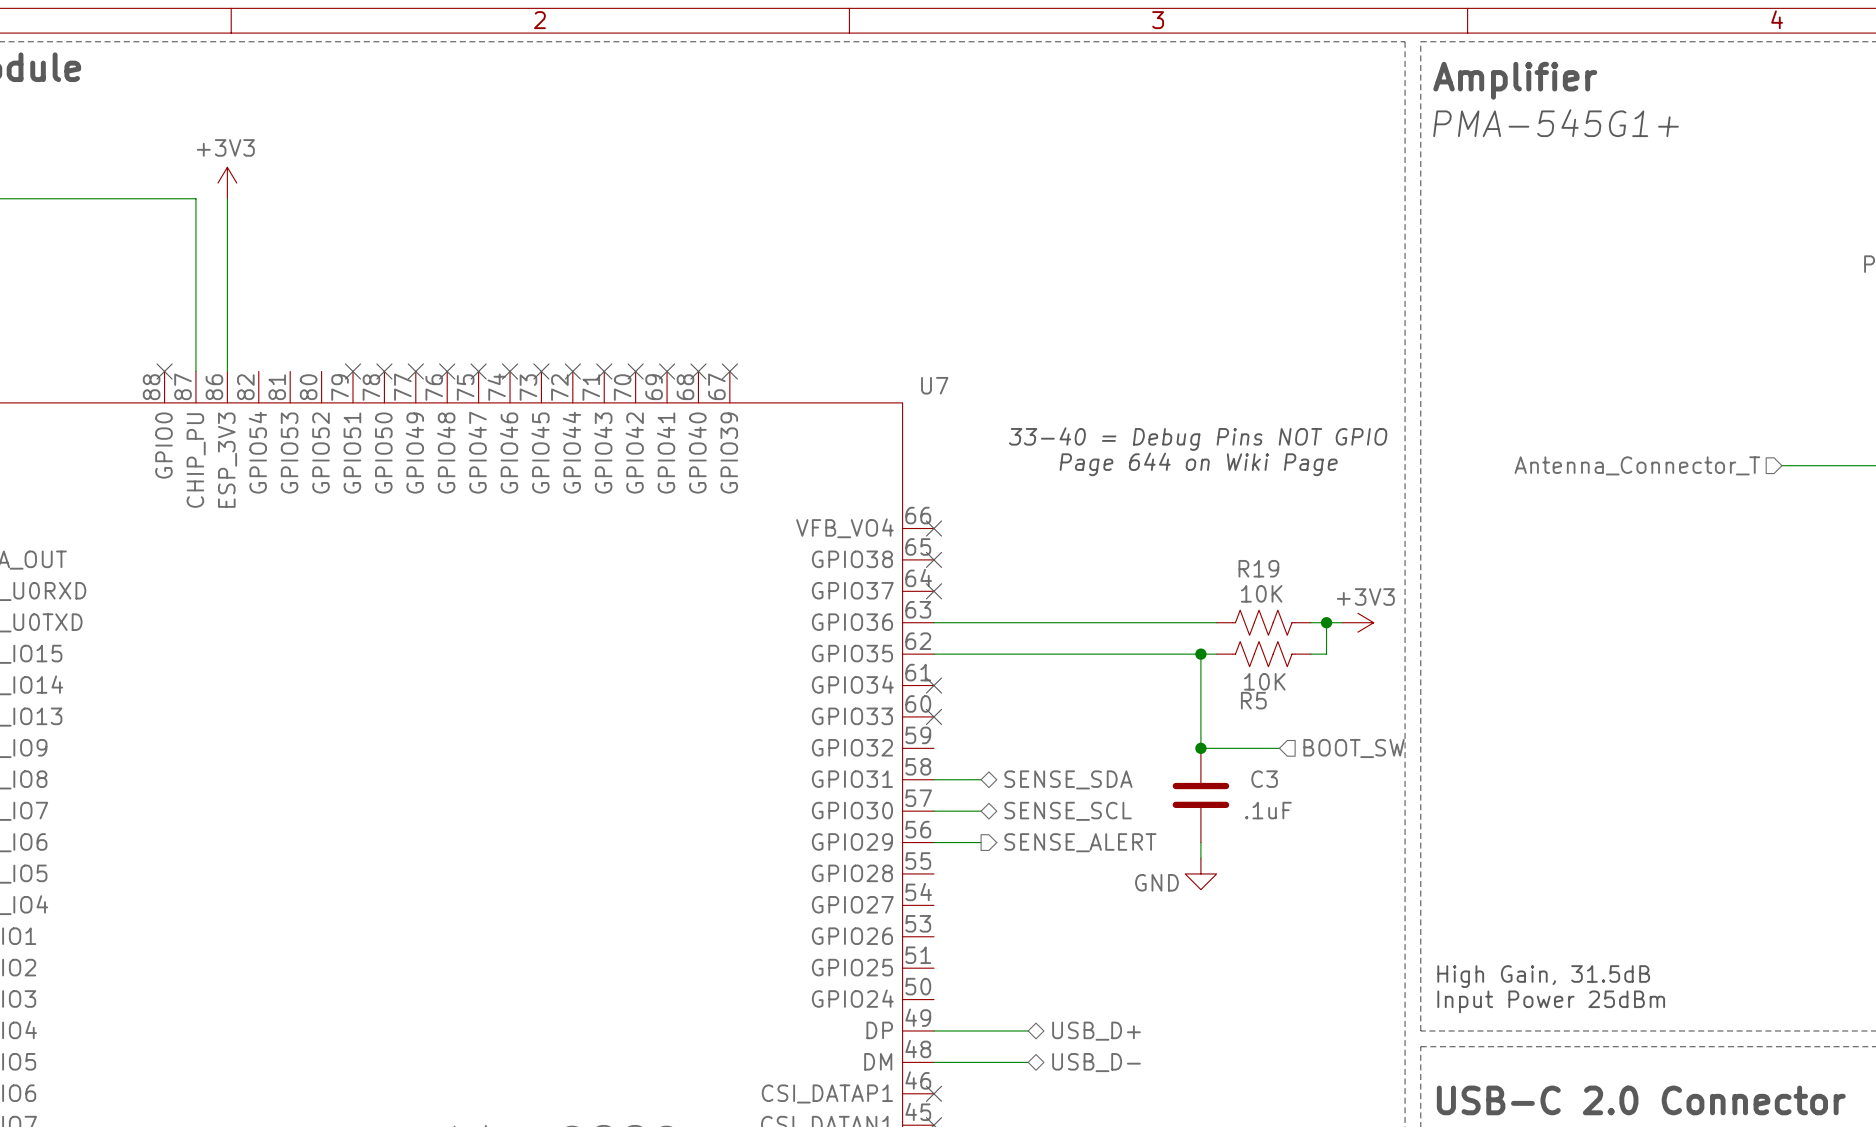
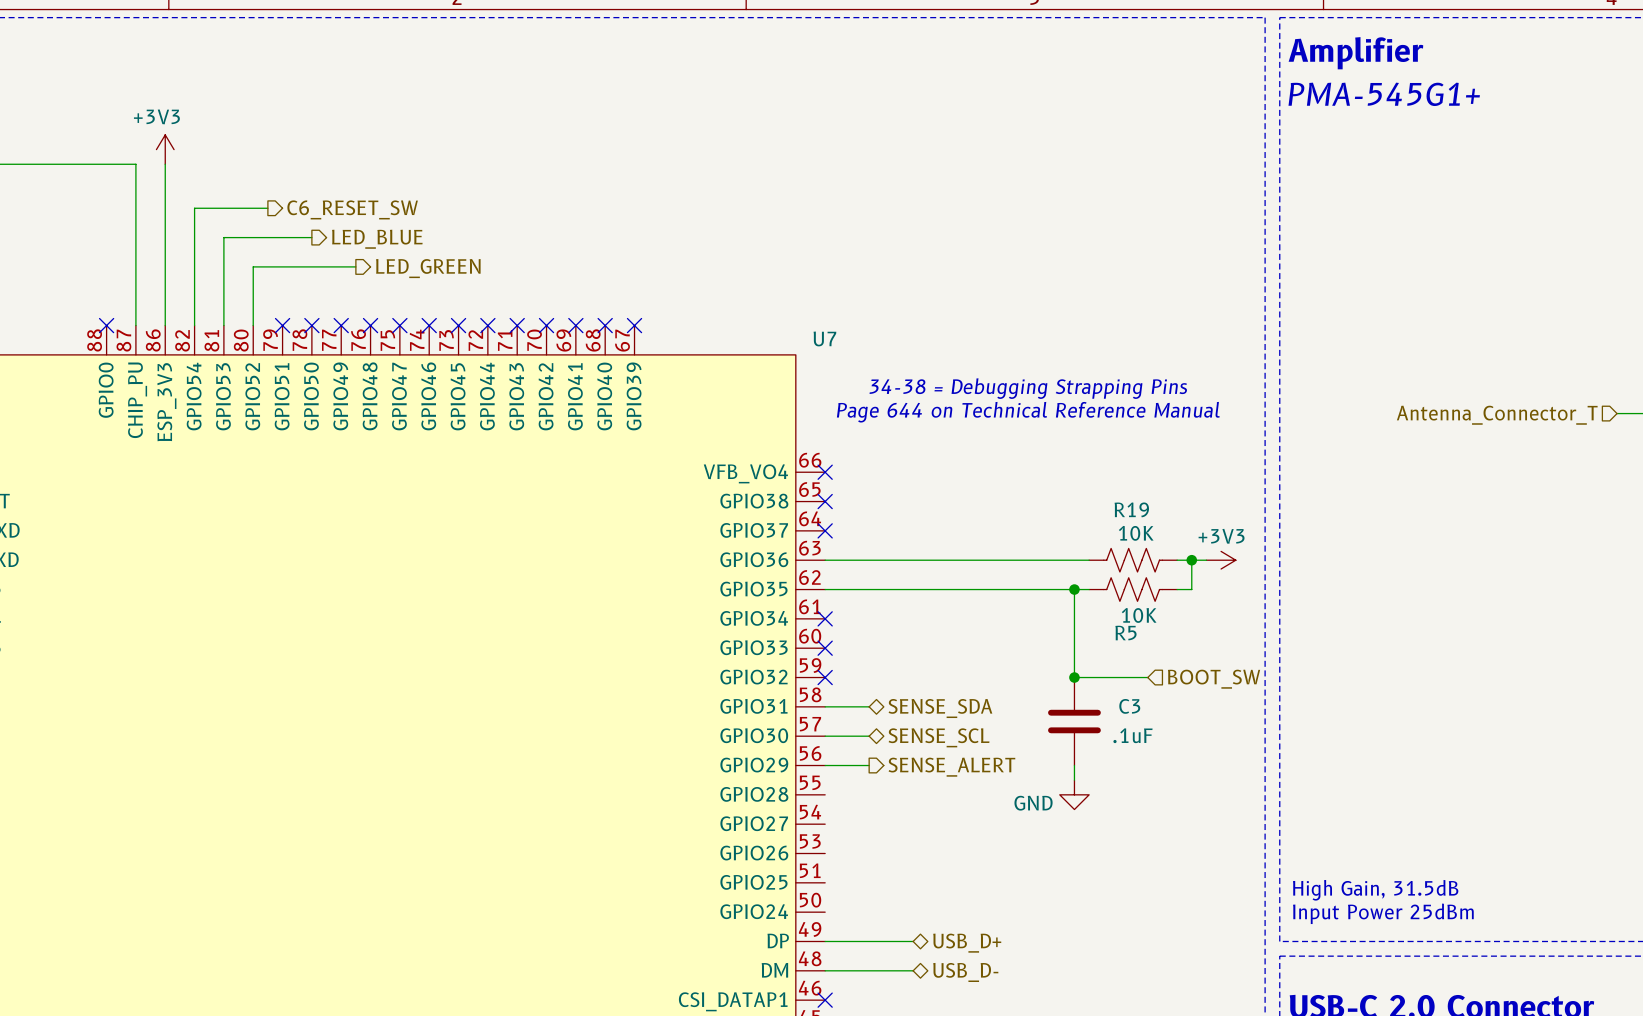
wire: none -> (267, 208) (194, 208) (194, 325)
hierarchical label: none -> C6_RESET_SW (352, 209)
wire: none -> (311, 237) (223, 237) (223, 325)
hierarchical label: none -> LED_BLUE (377, 239)
wire: none -> (355, 266) (253, 266) (253, 325)
hierarchical label: none -> LED_GREEN (428, 268)
text: none -> 34-38 = Debugging Strapping Pins (1028, 388)
text: 33-40 = Debug Pins NOT GPIO (1198, 439) -> none
text: none -> Page 644 on Technical Reference Manual (1028, 412)
text: Page 644 on Wiki Page (1198, 464) -> none
no-connect mark: none -> (825, 677)

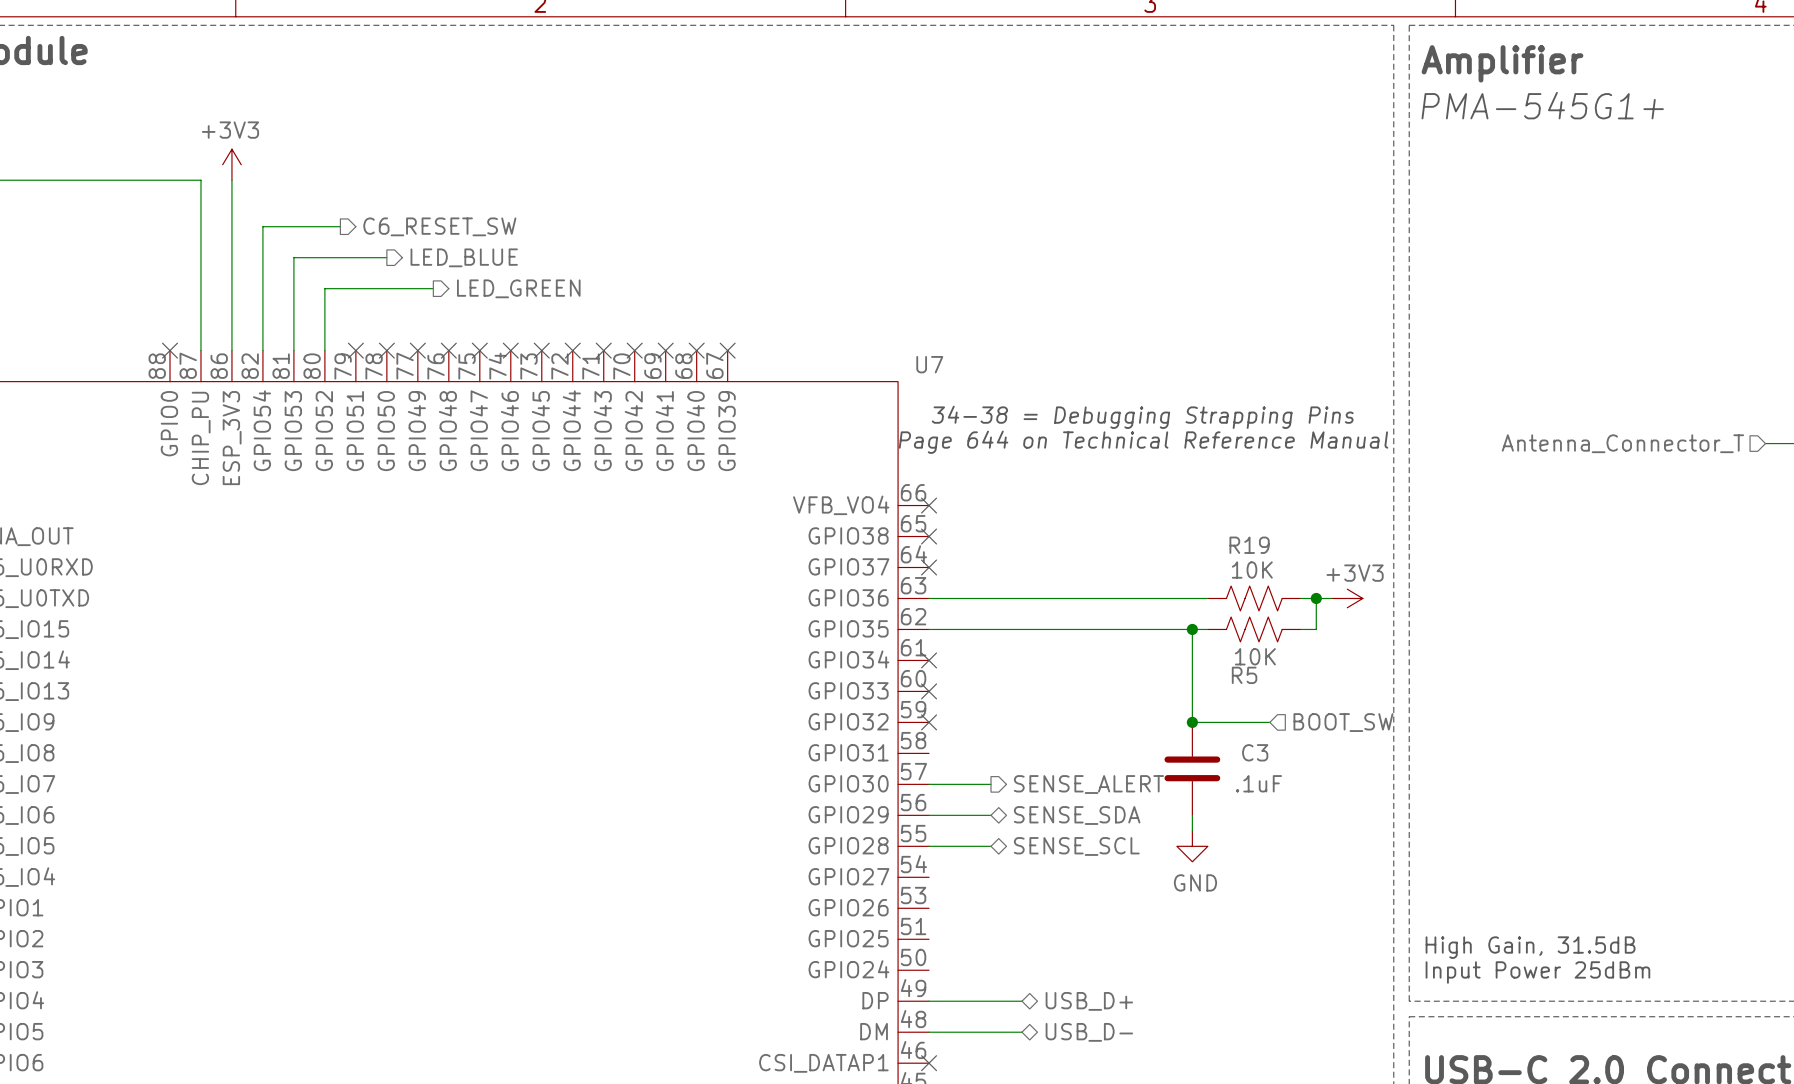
wire: (825, 706) (869, 706) -> none
hierarchical label position: SENSE_SDA (940, 708) -> SENSE_SDA (1077, 815)
wire: none -> (975, 784) (991, 784)
hierarchical label position: SENSE_SCL (939, 737) -> SENSE_SCL (1076, 846)
wire: none -> (975, 815) (991, 815)
hierarchical label position: SENSE_ALERT (951, 767) -> SENSE_ALERT (1088, 784)
wire: none -> (929, 846) (991, 846)
power symbol text position: GND (1033, 803) -> GND (1195, 882)

